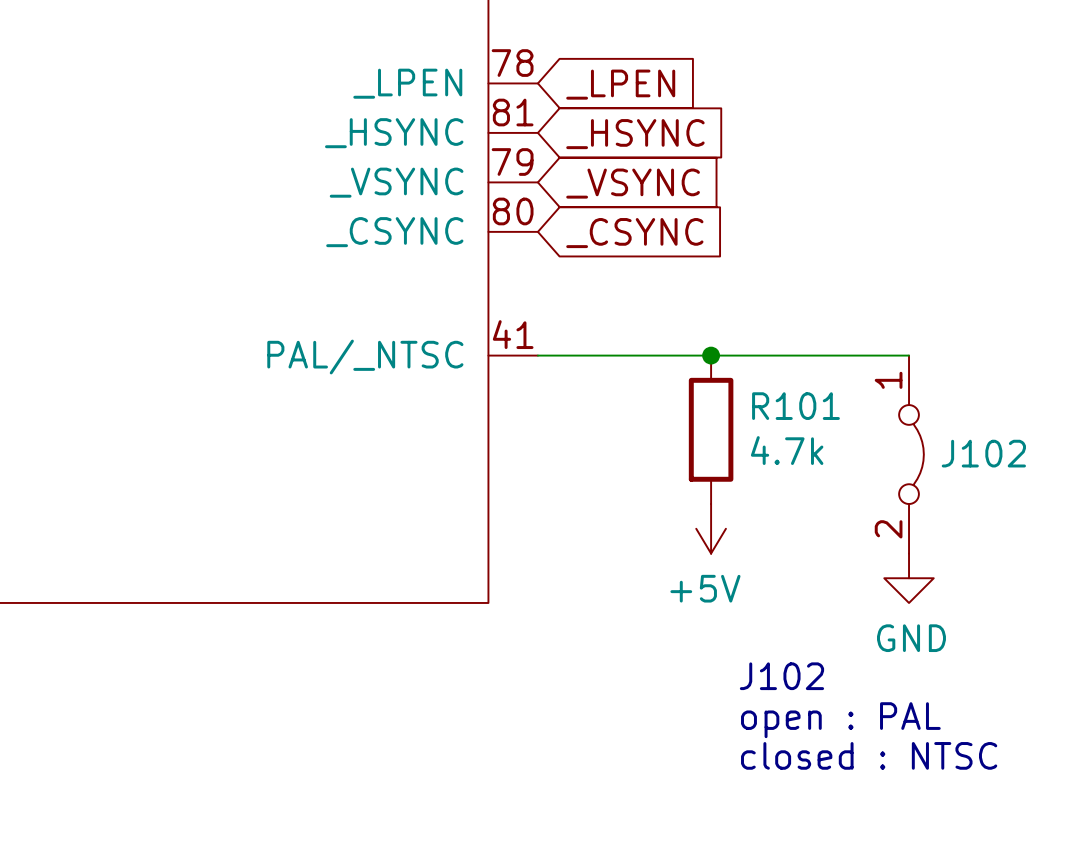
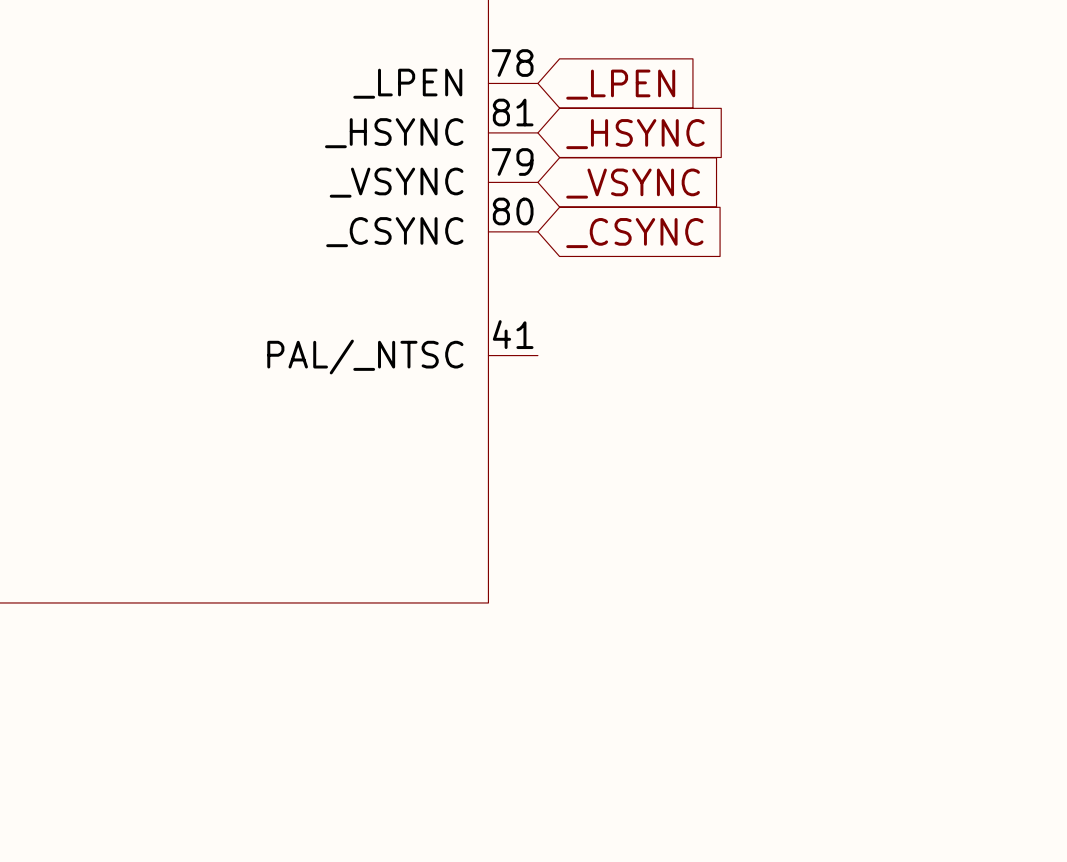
wire: (537, 355) (909, 355) -> none
junction: (711, 355) -> none
R101: 4.7k (711, 429) -> none
J102: (911, 454) -> none
power symbol: +5V (711, 528) -> none
power symbol: GND (909, 578) -> none
text: J102 (781, 676) -> none
text: open : PAL (840, 720) -> none
text: closed : NTSC (869, 755) -> none

